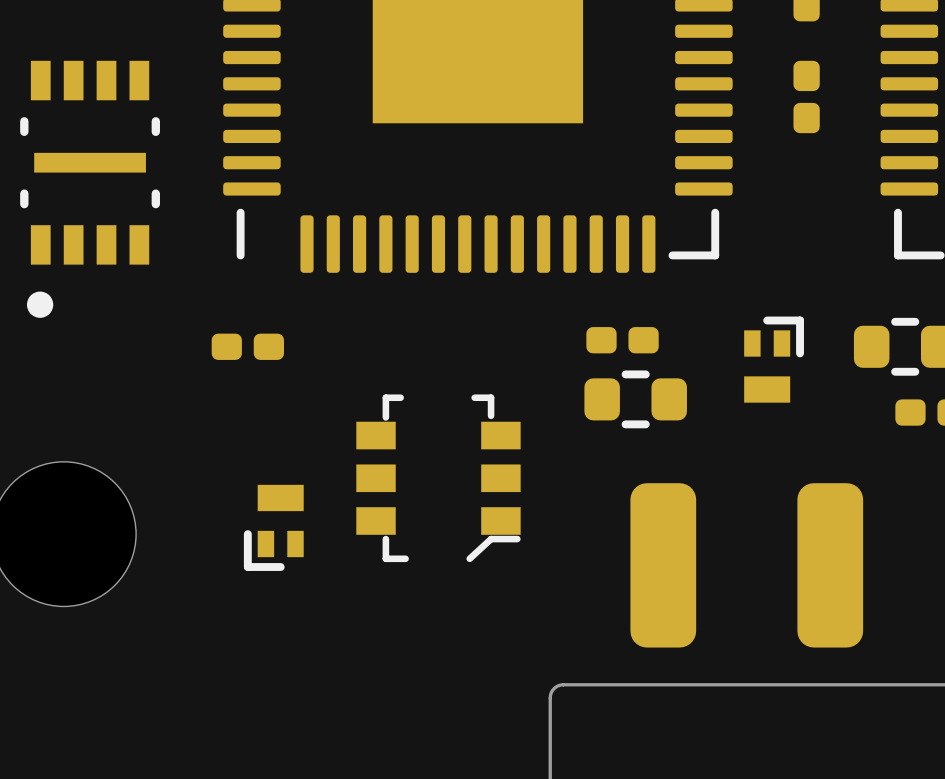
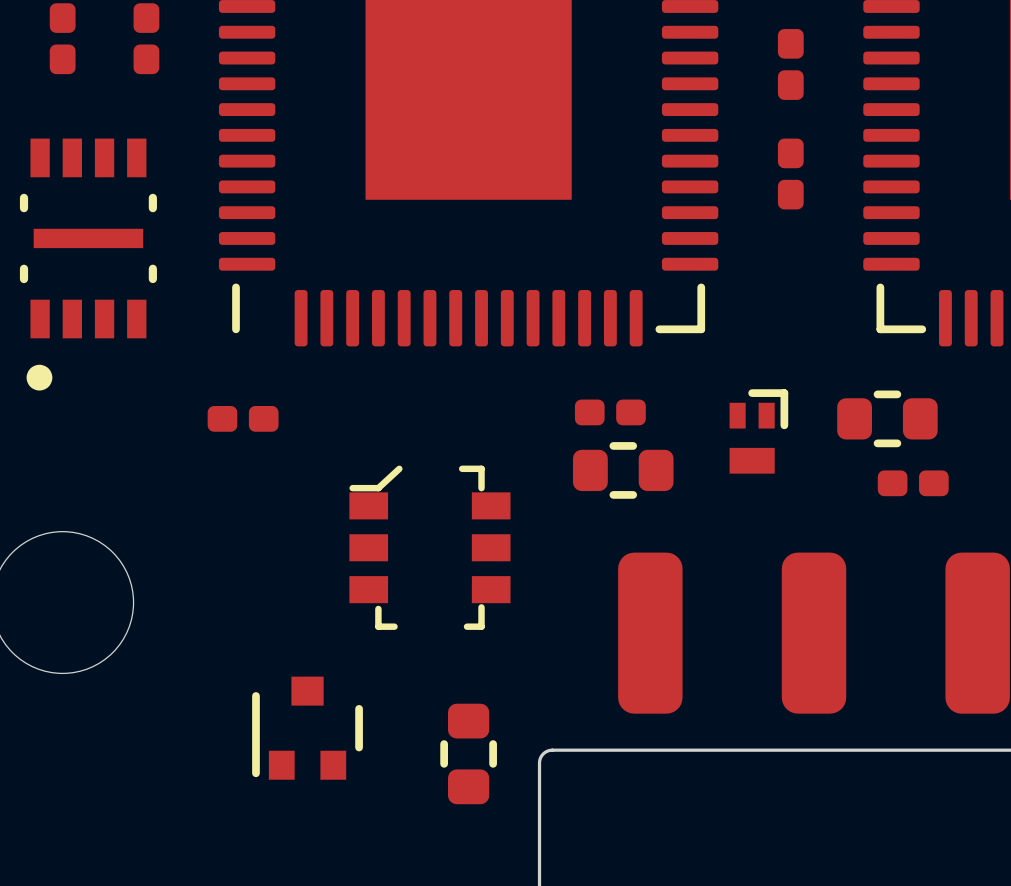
part rotation: 0° (438, 478) -> 180° (429, 547)
part: (273, 527) -> none
part: none -> (307, 728)
part: none -> (468, 753)

